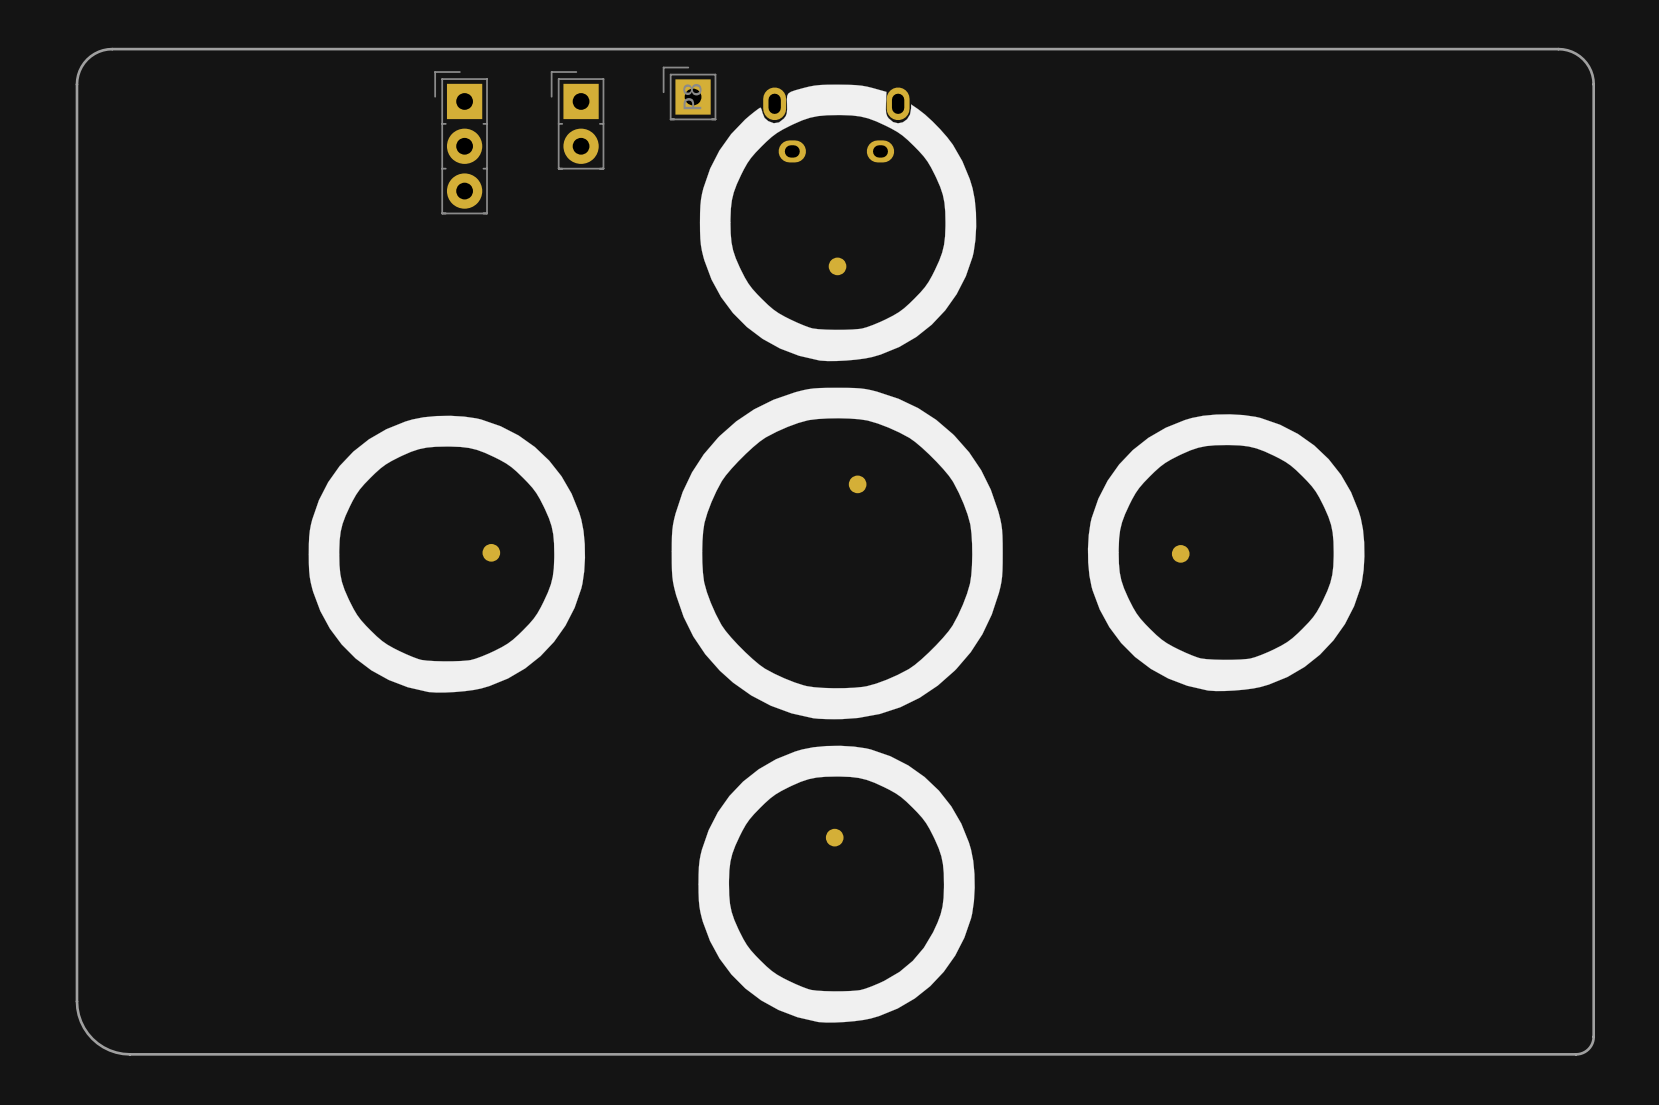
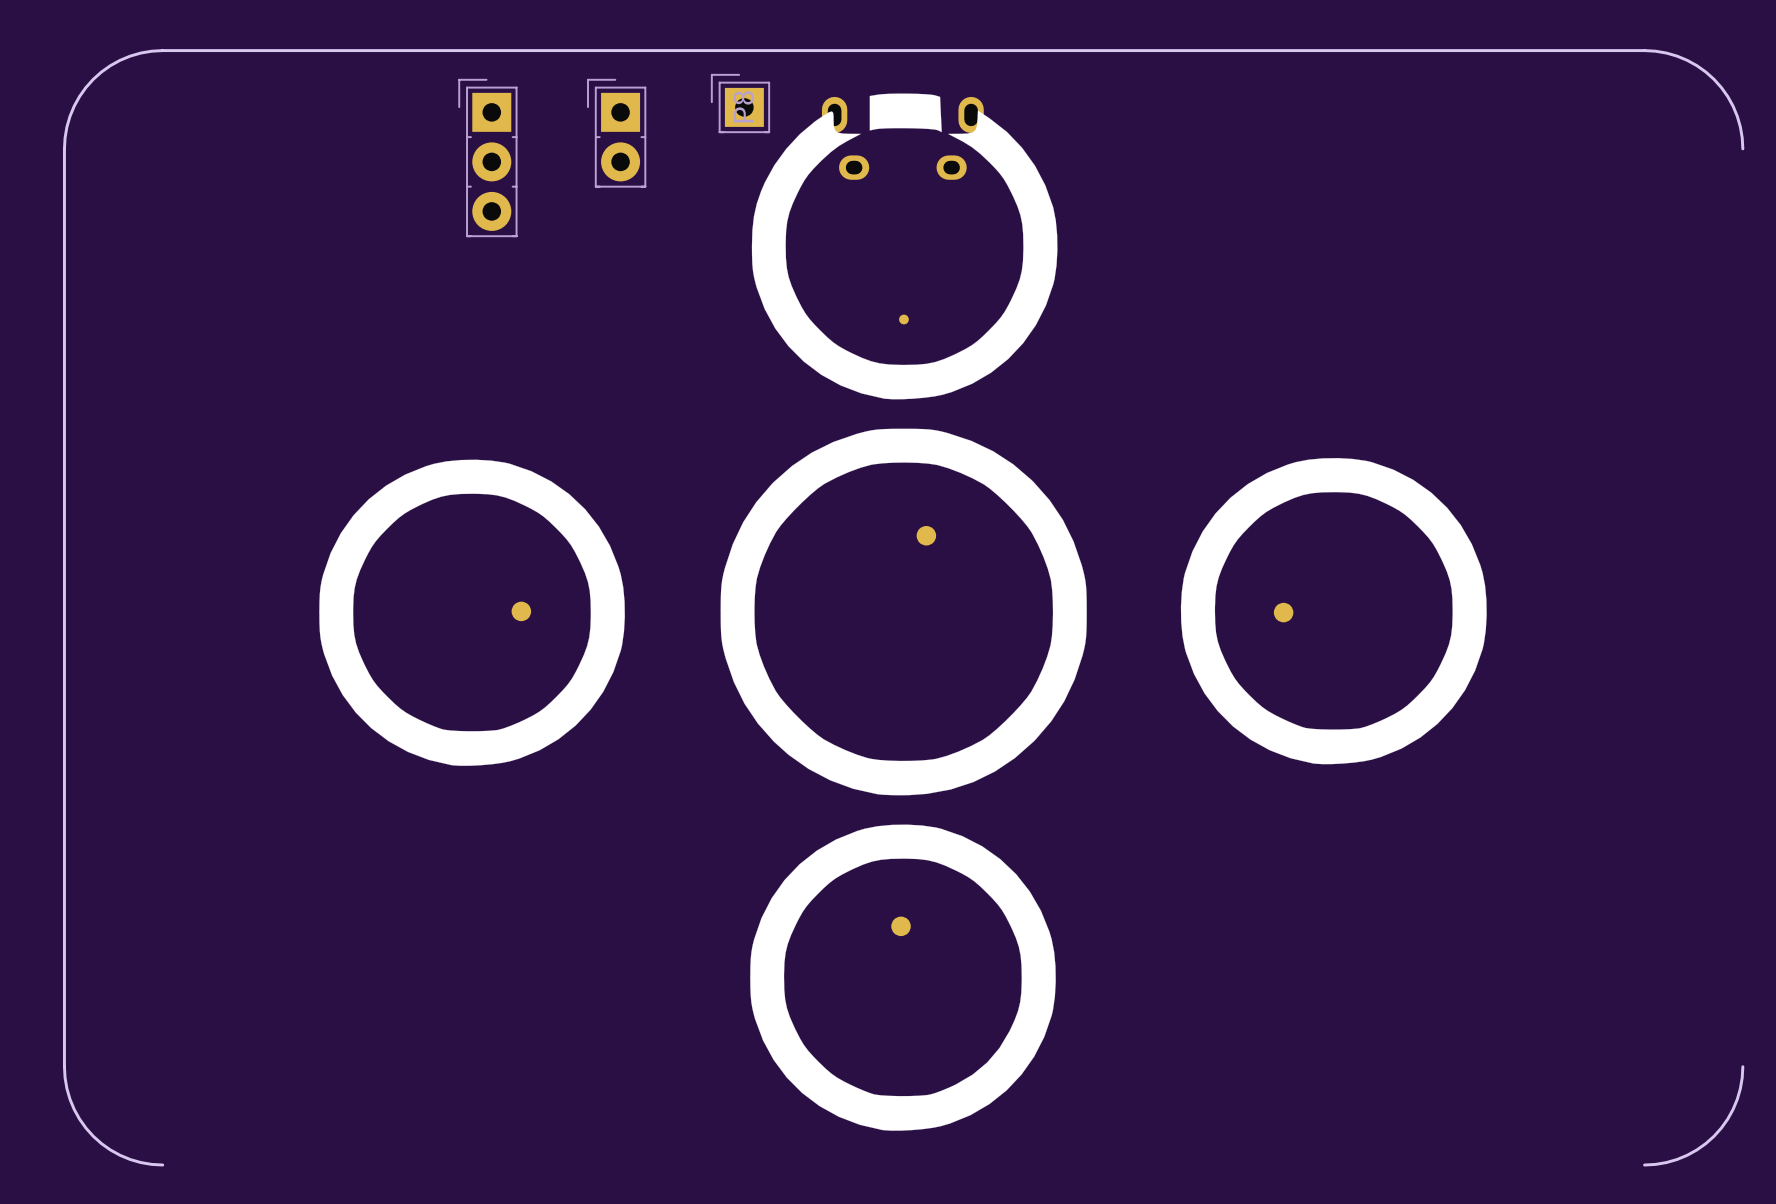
board edge: none -> (162, 50) (1655, 51) (1687, 60) (1714, 79) (1727, 96) (1737, 116) (1742, 148)
board edge: none -> (162, 50) (130, 56) (110, 65) (93, 79) (79, 96) (69, 116) (64, 148)
drawing shape: [308, 84, 1365, 1023] -> [319, 93, 1487, 1131]
board edge: none -> (64, 149) (65, 1077) (74, 1109) (93, 1136) (120, 1155) (140, 1162) (162, 1165)
part: (837, 266) -> none
part: none -> (903, 319)
board edge: none -> (1742, 1066) (1740, 1088) (1733, 1109) (1714, 1136) (1696, 1149) (1677, 1159) (1644, 1165)
board edge: (76, 1001) (81, 1021) (92, 1038) (109, 1050) (129, 1054) (1576, 1054) (1584, 1052) (1591, 1045) (1593, 1036) (1593, 84) (1588, 66) (1576, 53) (1558, 49) (112, 49) (94, 53) (81, 66) (76, 84) (76, 1001) -> none

